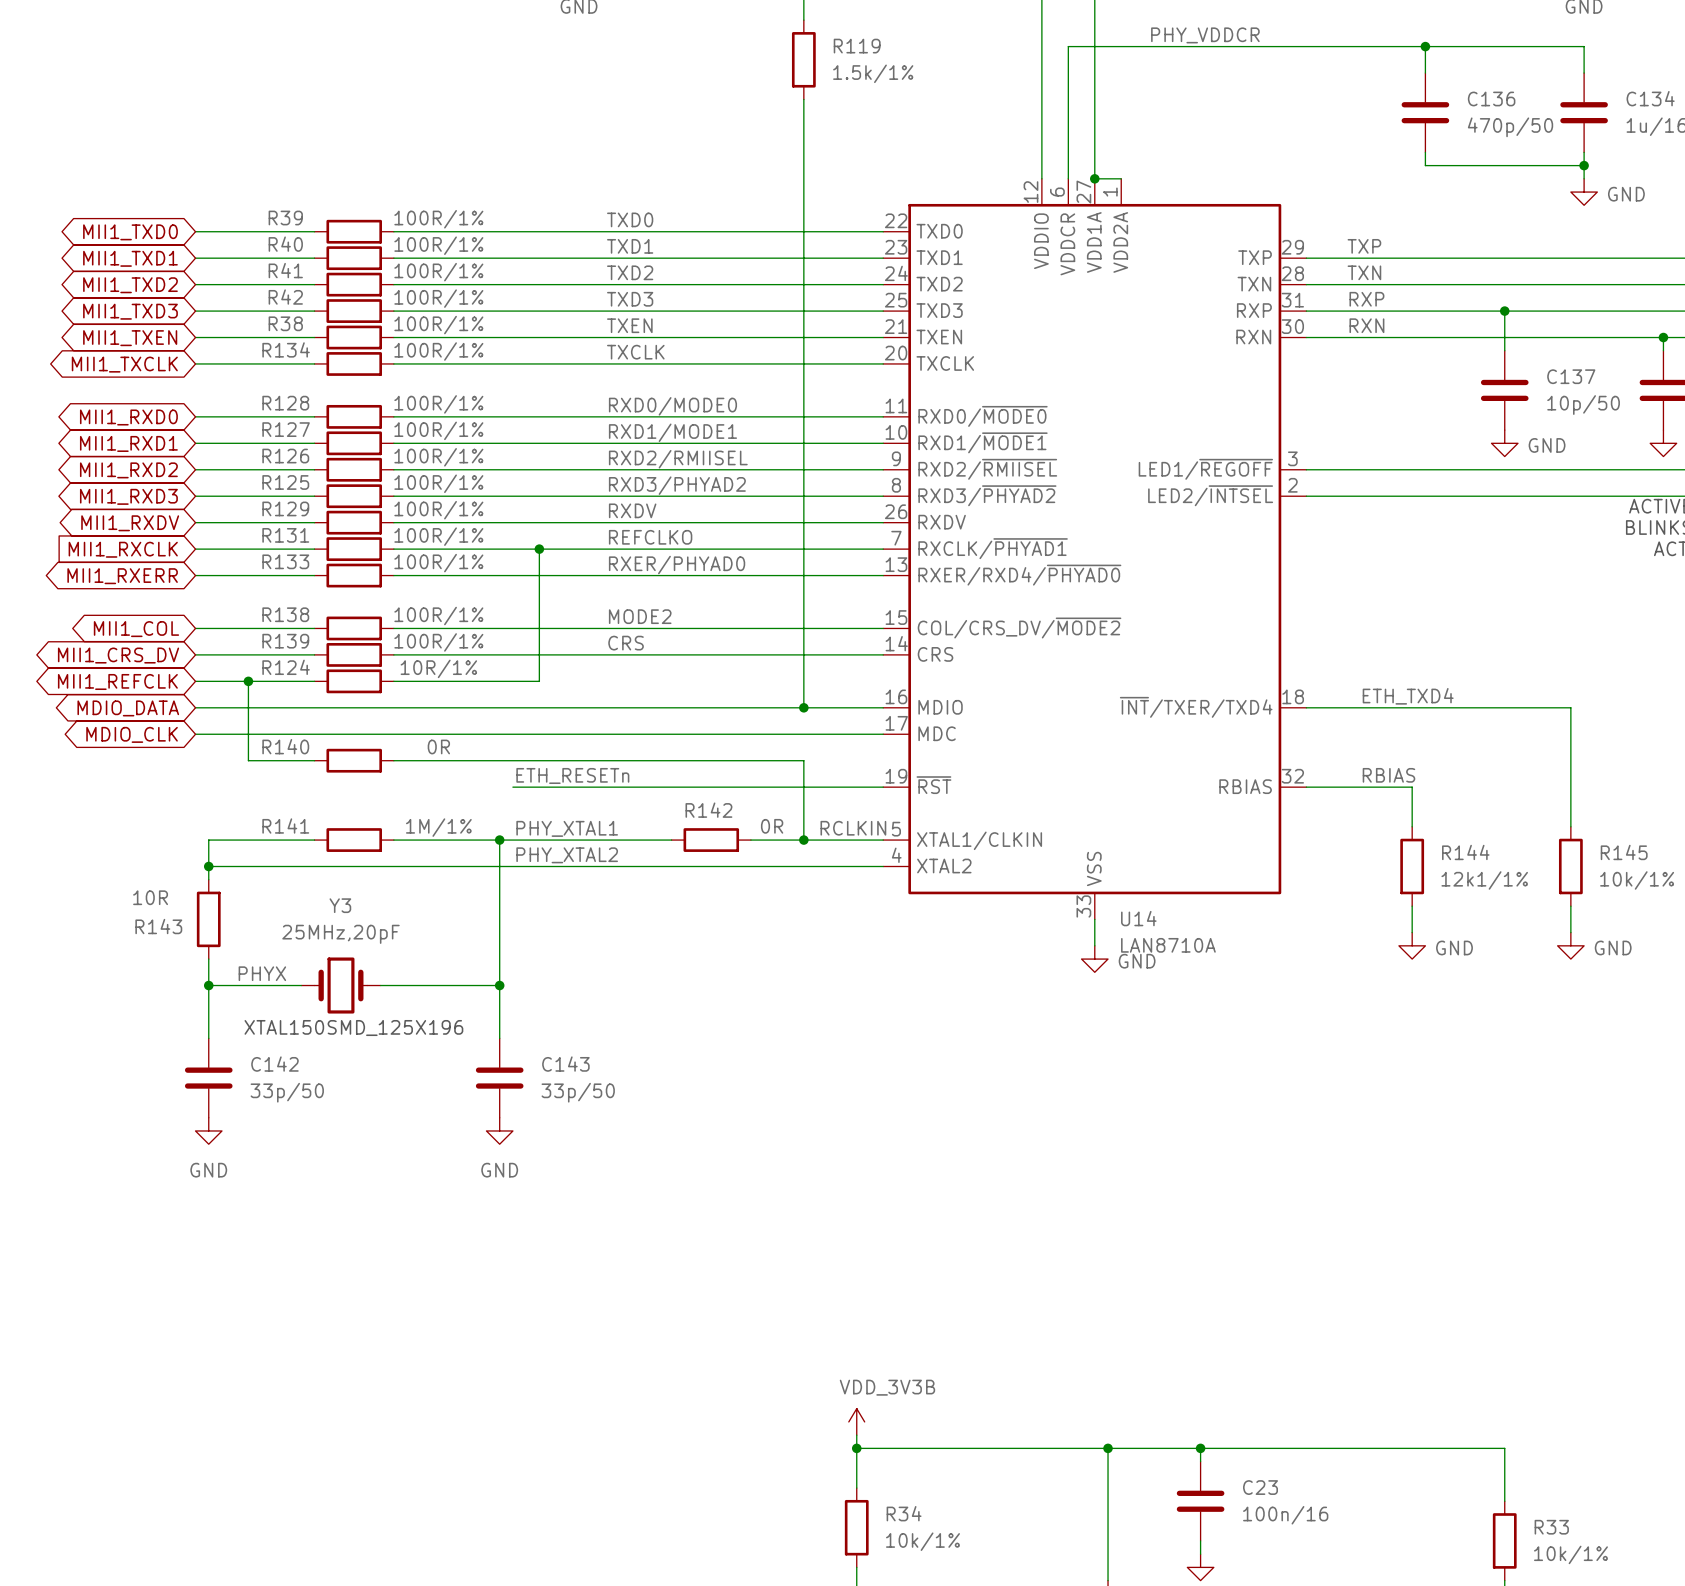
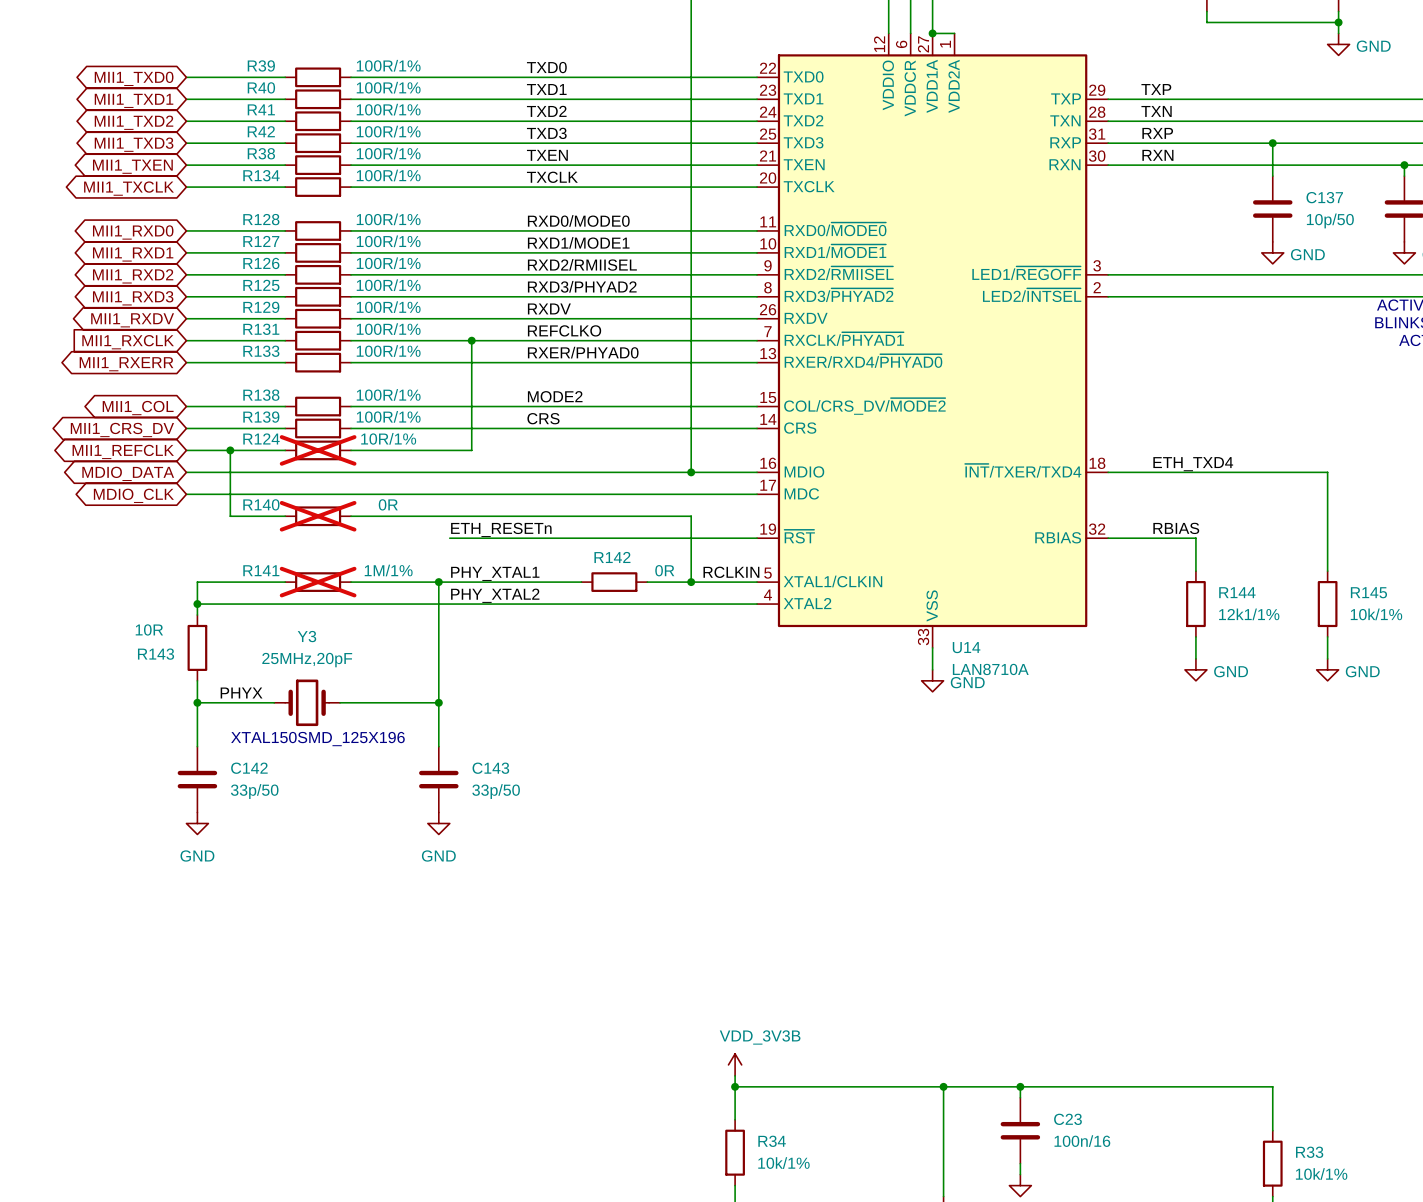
R124 do-not-place cross: none -> (318, 450)
R140 do-not-place cross: none -> (318, 516)
R141 do-not-place cross: none -> (318, 582)

